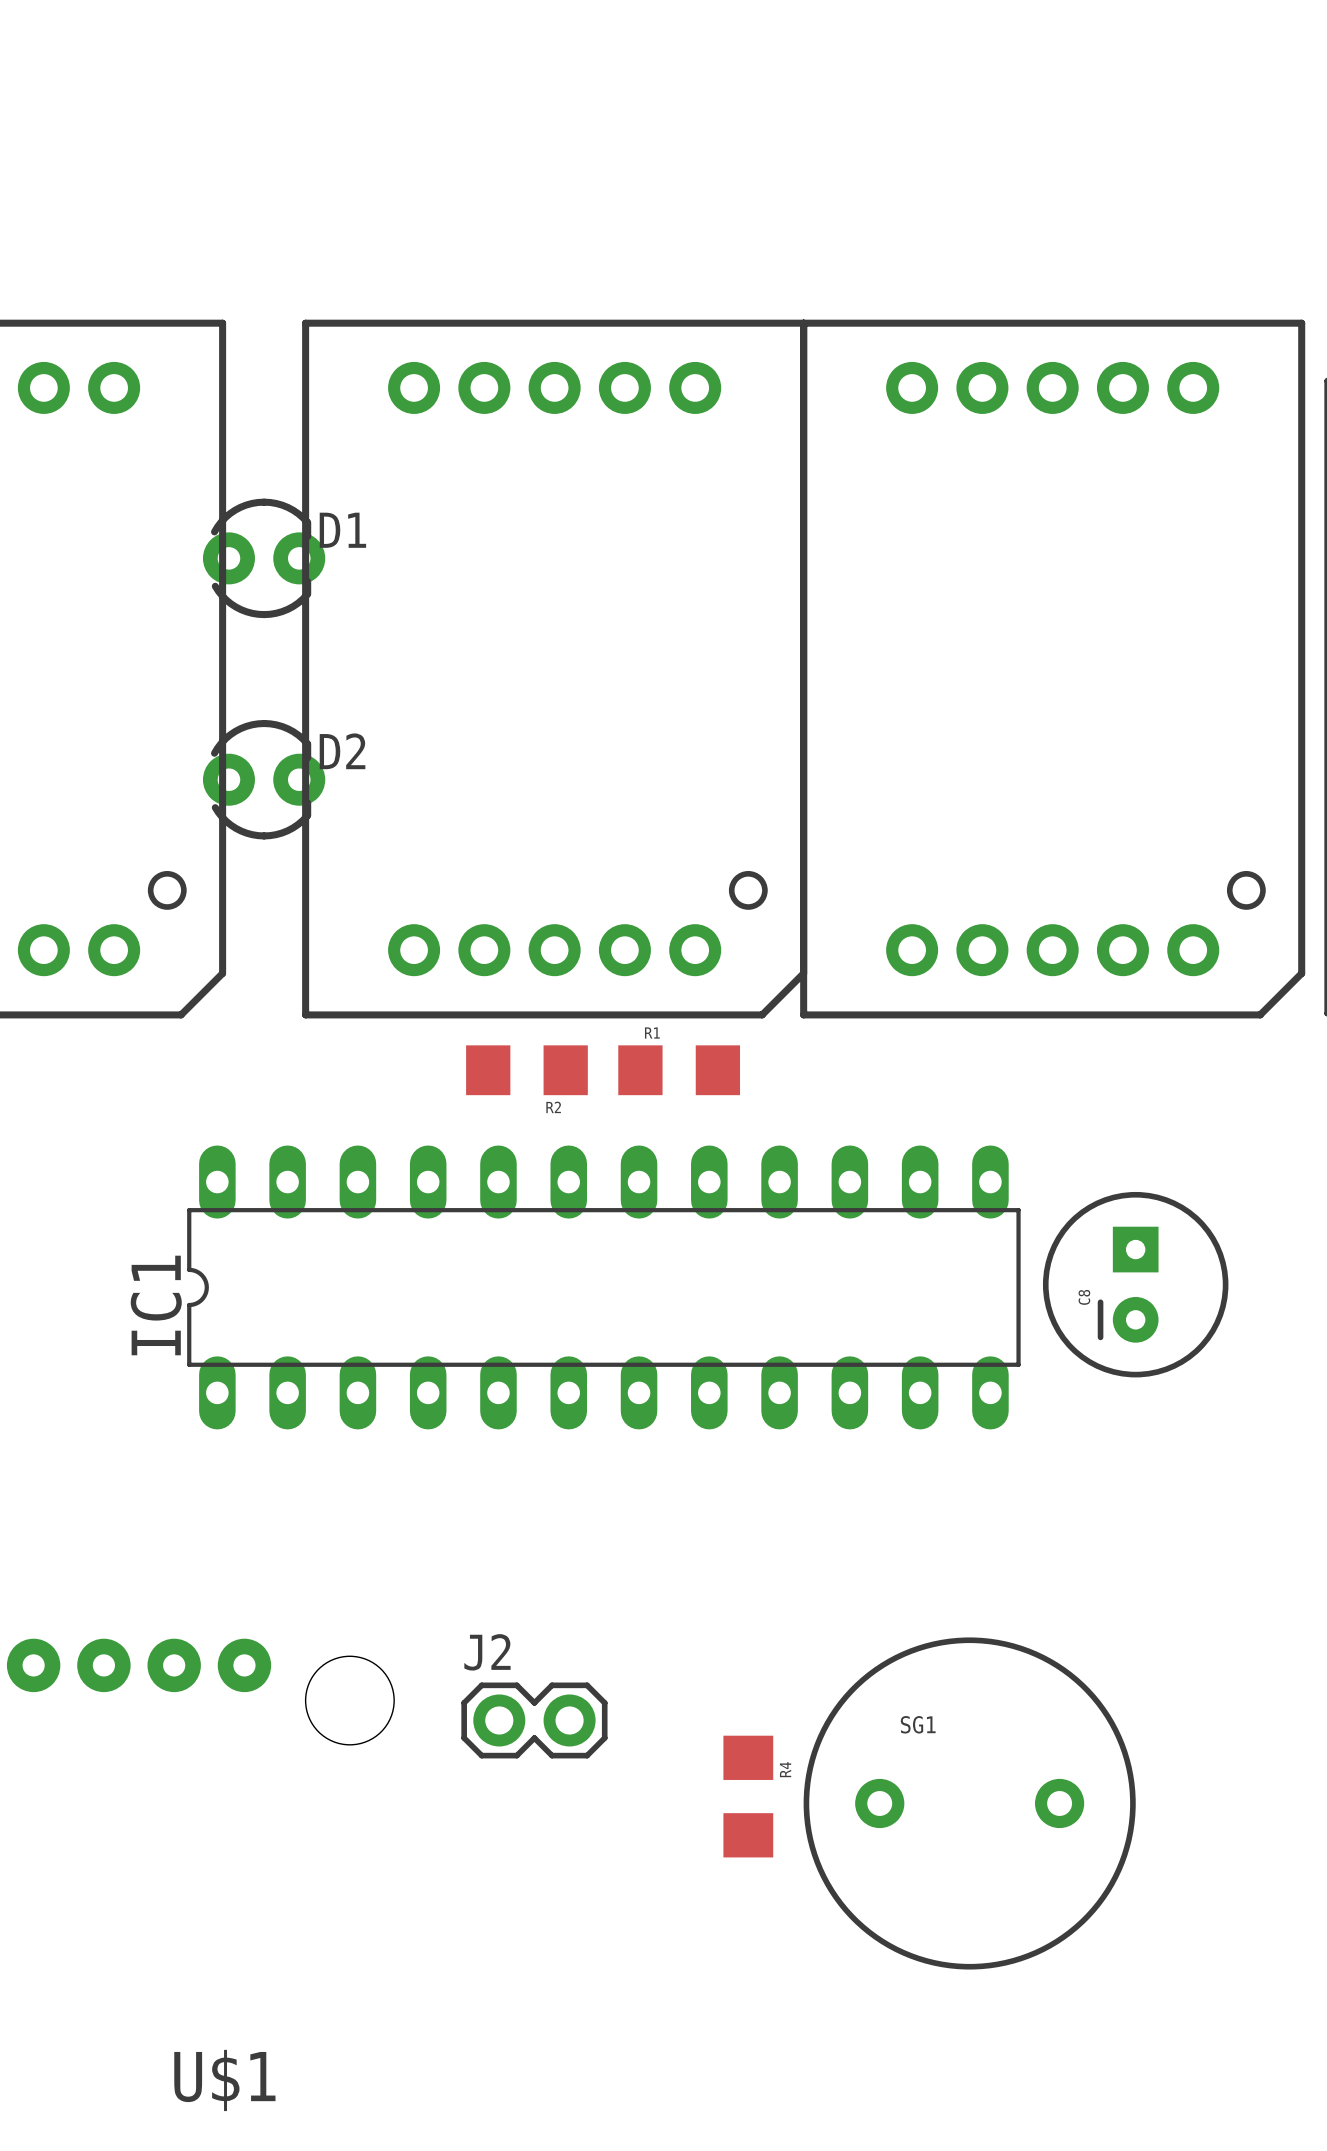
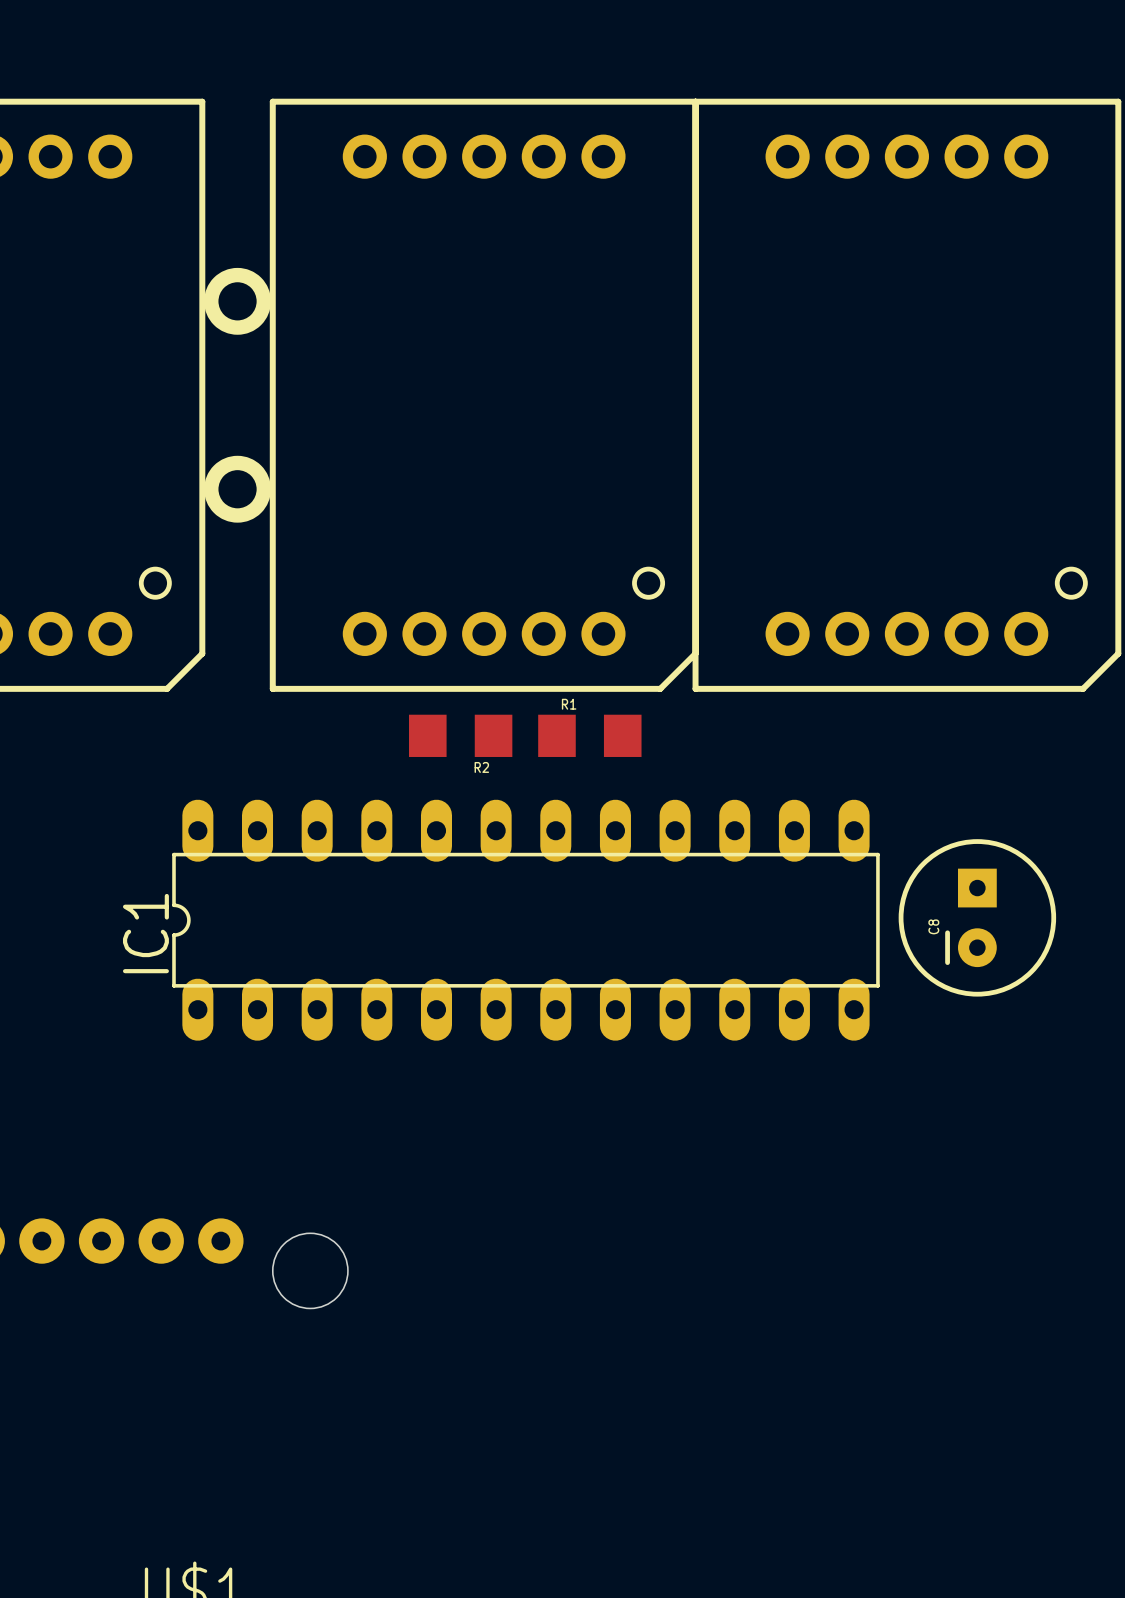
drawing: none -> [204, 267, 271, 335]
D1: (264, 558) -> none
drawing: none -> [204, 455, 271, 523]
D2: (264, 779) -> none
J2: (534, 1720) -> none
R4: (748, 1796) -> none
SG1: (969, 1803) -> none

